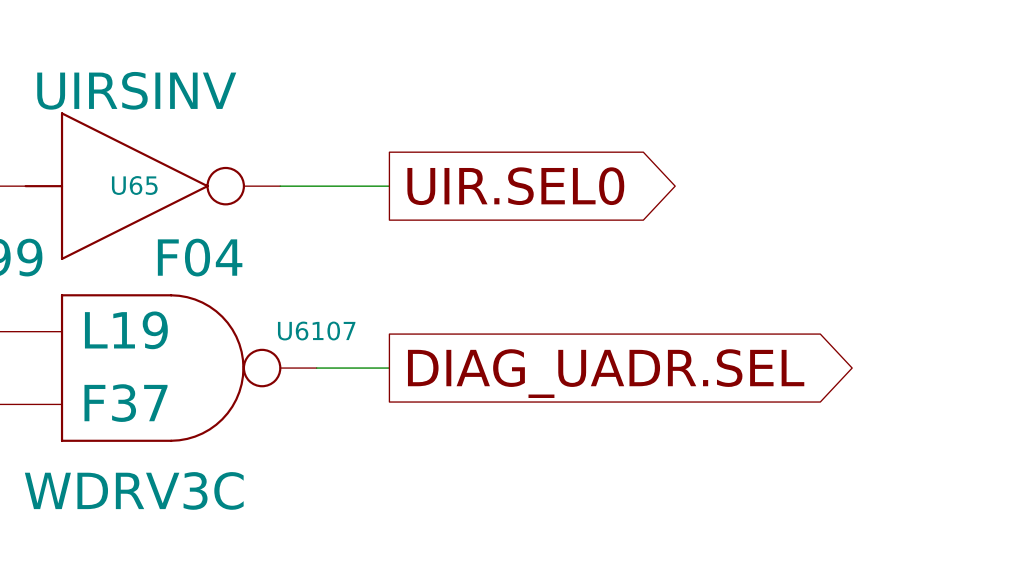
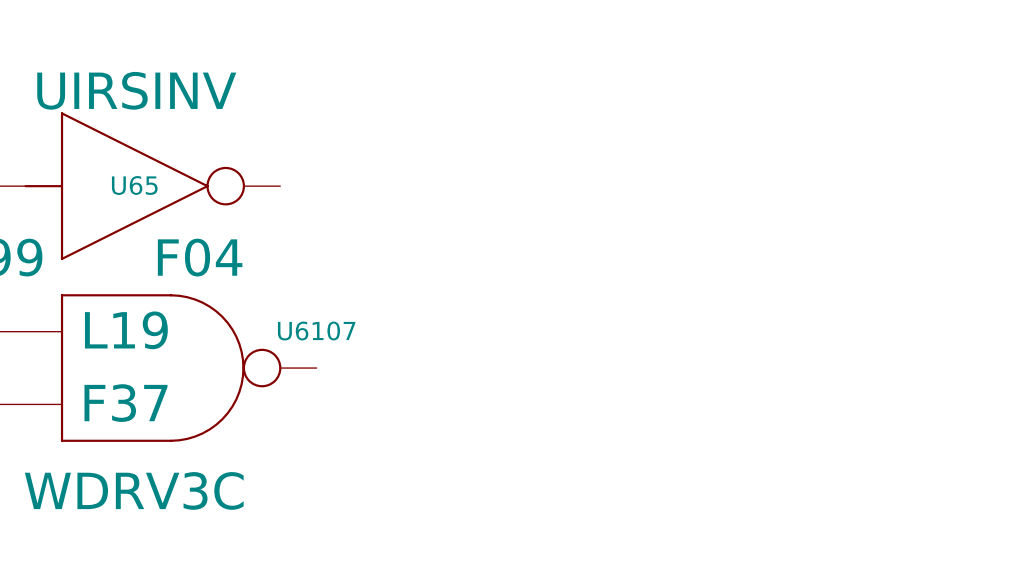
wire: (280, 186) (389, 186) -> none
global label: UIR.SEL0 (515, 186) -> none
wire: (316, 368) (389, 368) -> none
global label: DIAG_UADR.SEL (606, 373) -> none

